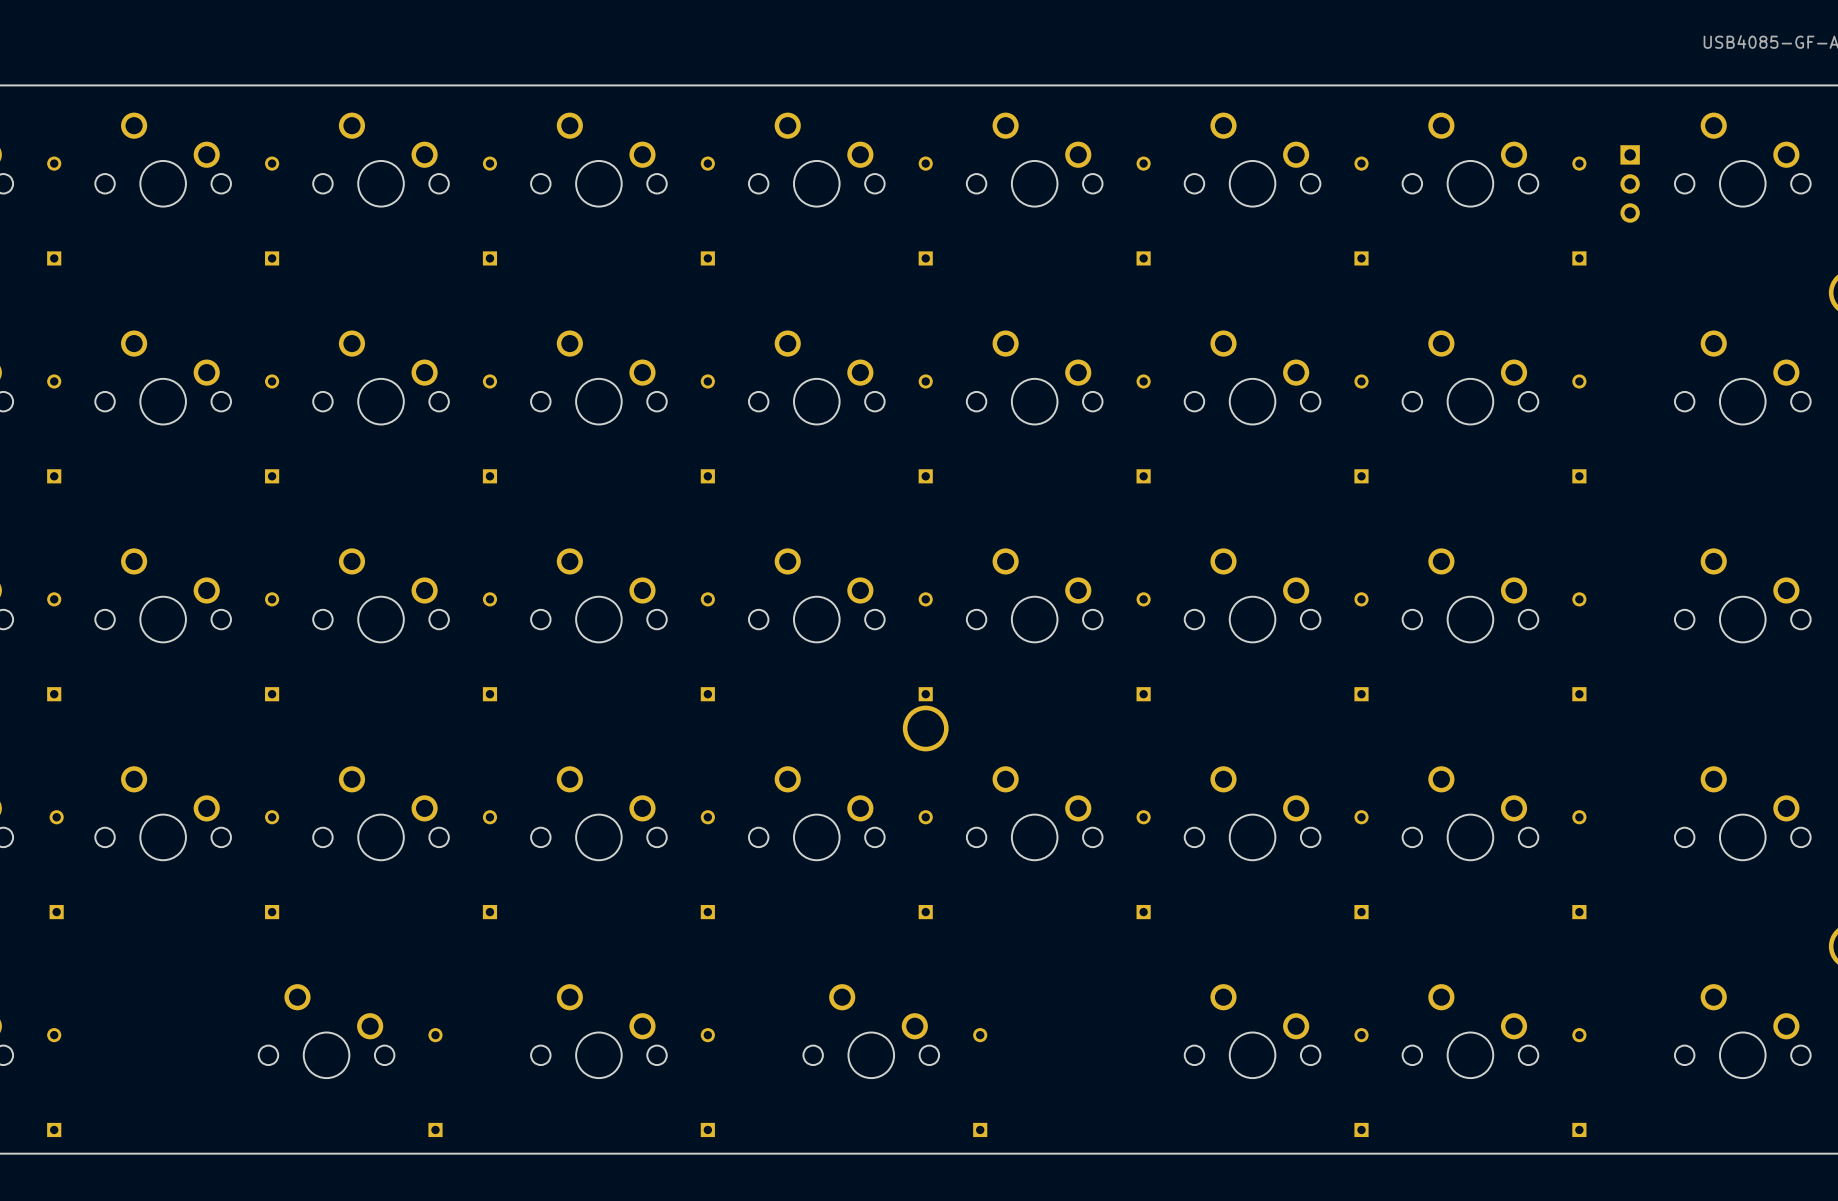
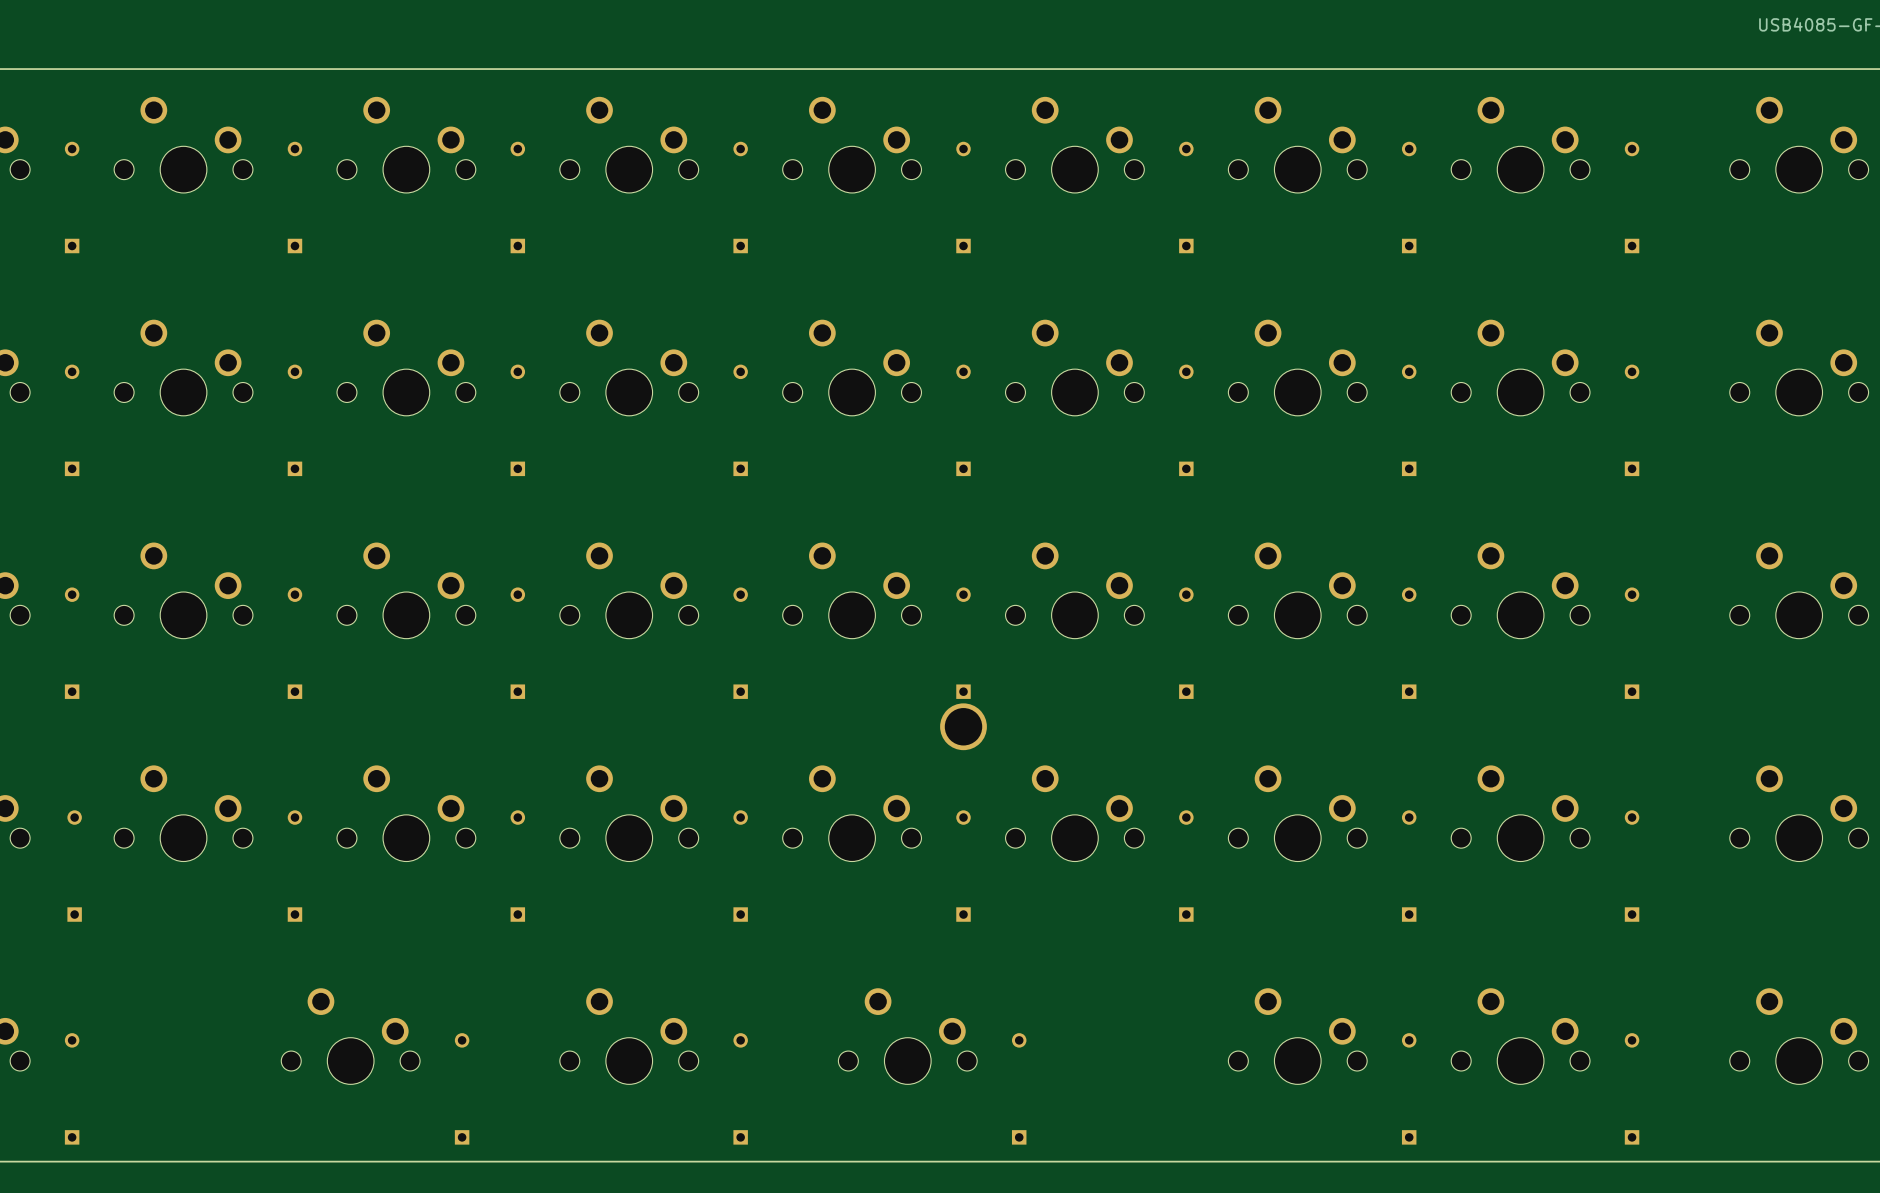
part: (1630, 183) -> none

